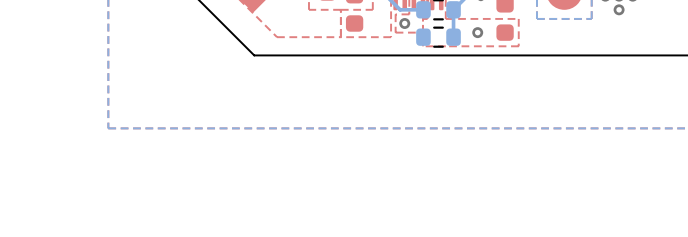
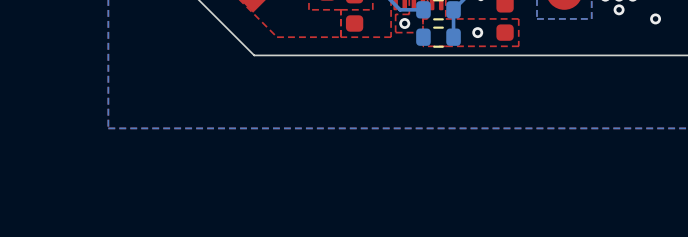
via: none -> (655, 18)

